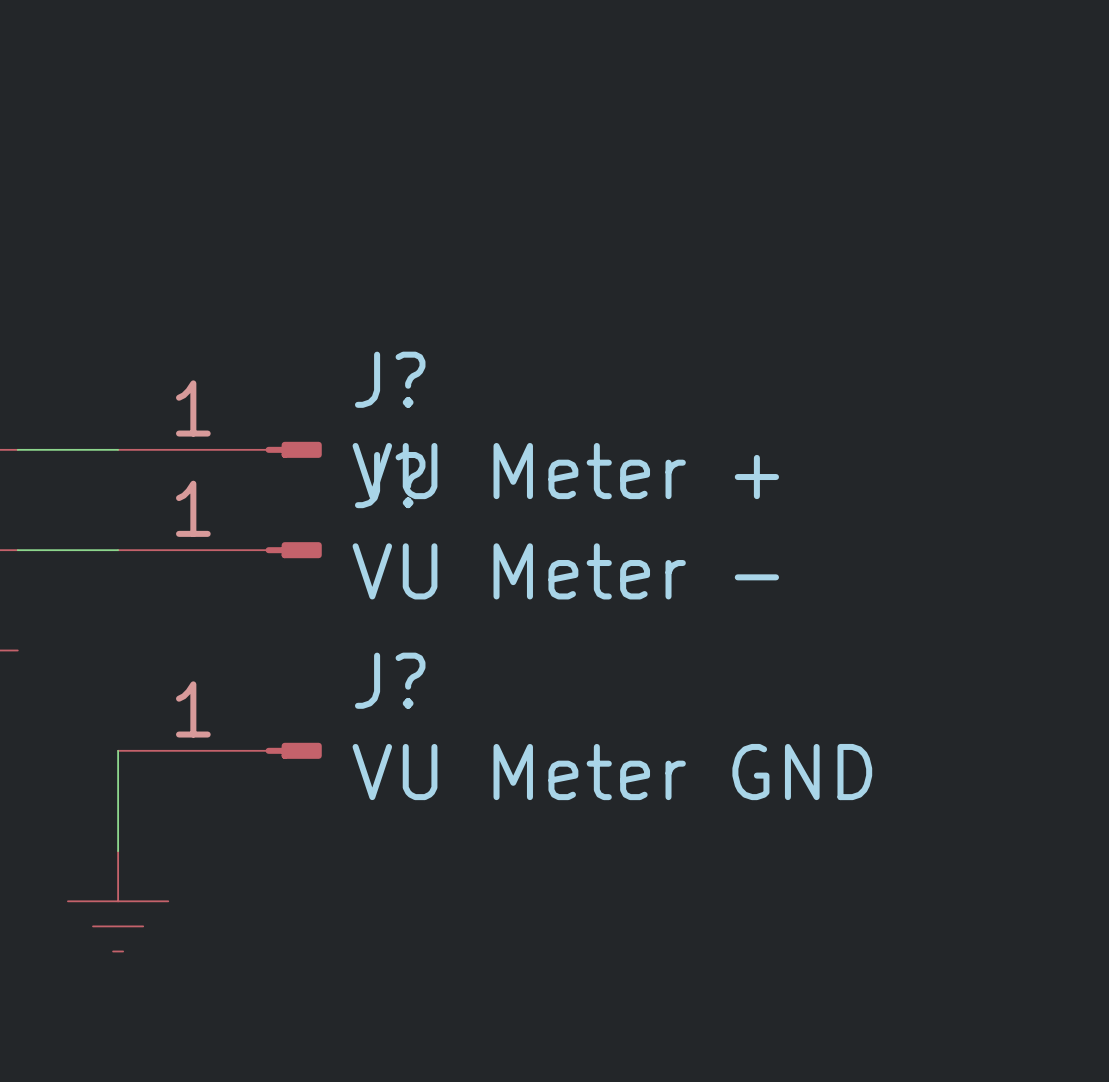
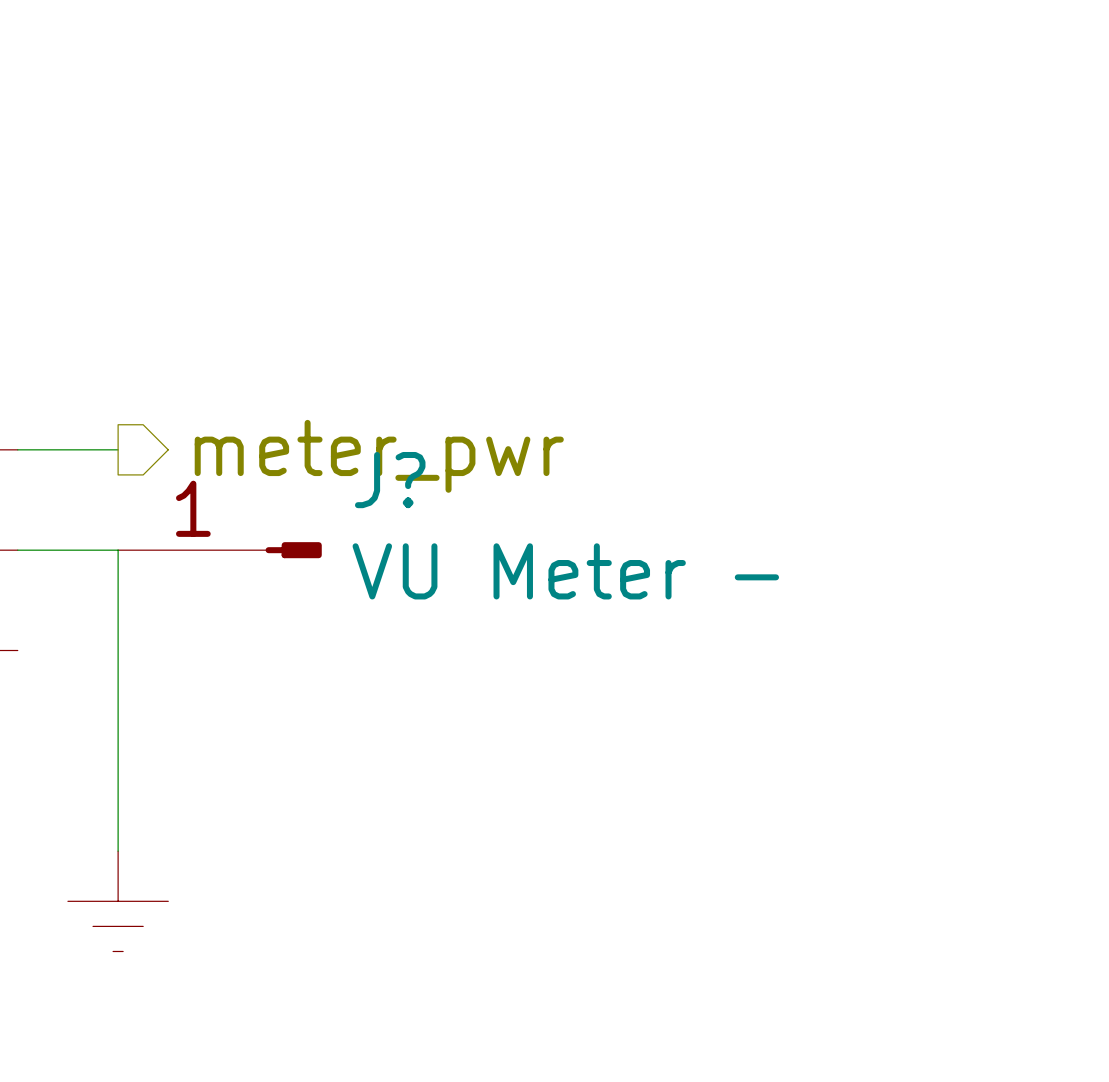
J?: VU Meter + (219, 449) -> none
hierarchical label: none -> meter_pwr (379, 456)
wire: none -> (118, 550) (118, 750)
J?: VU Meter GND (219, 750) -> none

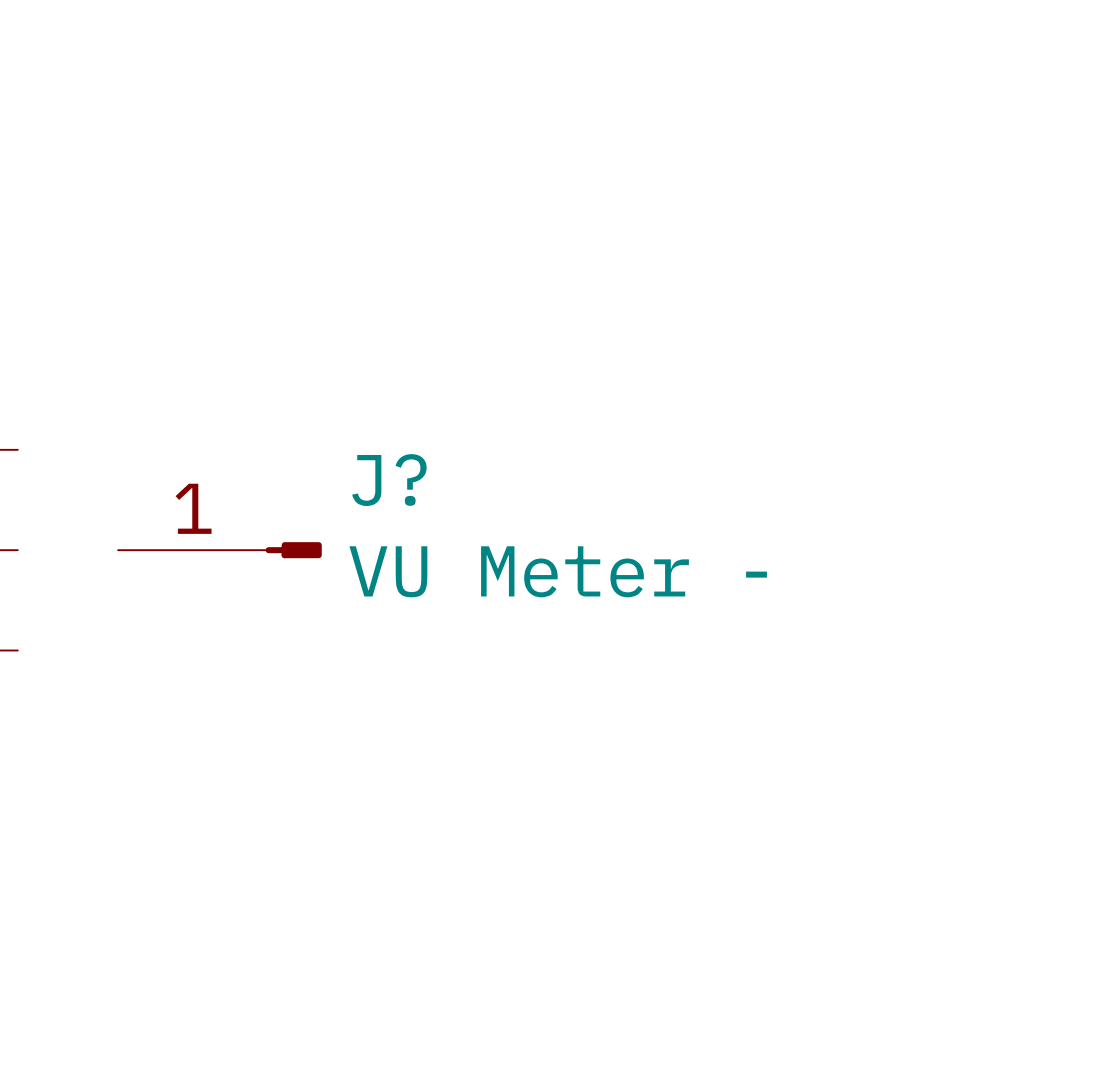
wire: (17, 449) (118, 449) -> none
hierarchical label: meter_pwr (379, 456) -> none
wire: (17, 550) (118, 550) (118, 851) -> none
power symbol: (118, 901) -> none

